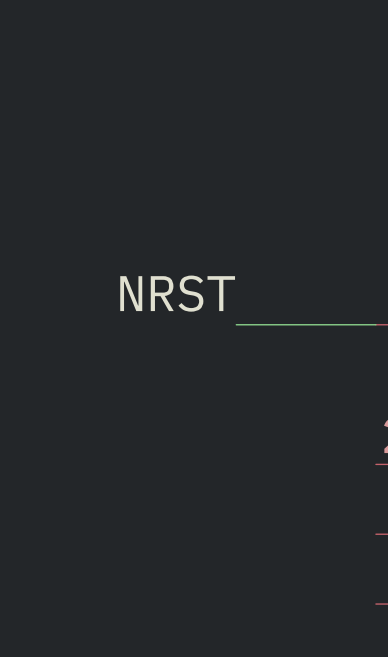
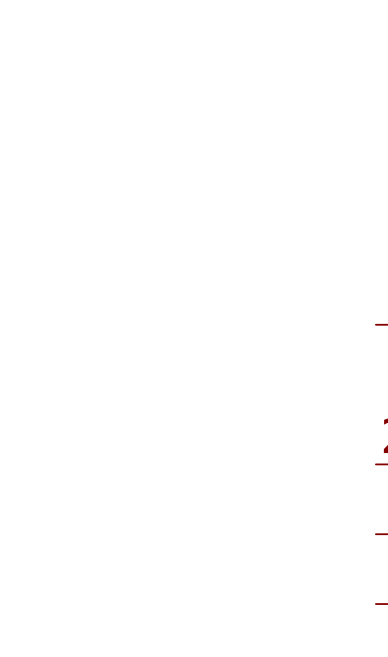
label: NRST (177, 293) -> none
wire: (236, 324) (375, 324) -> none

